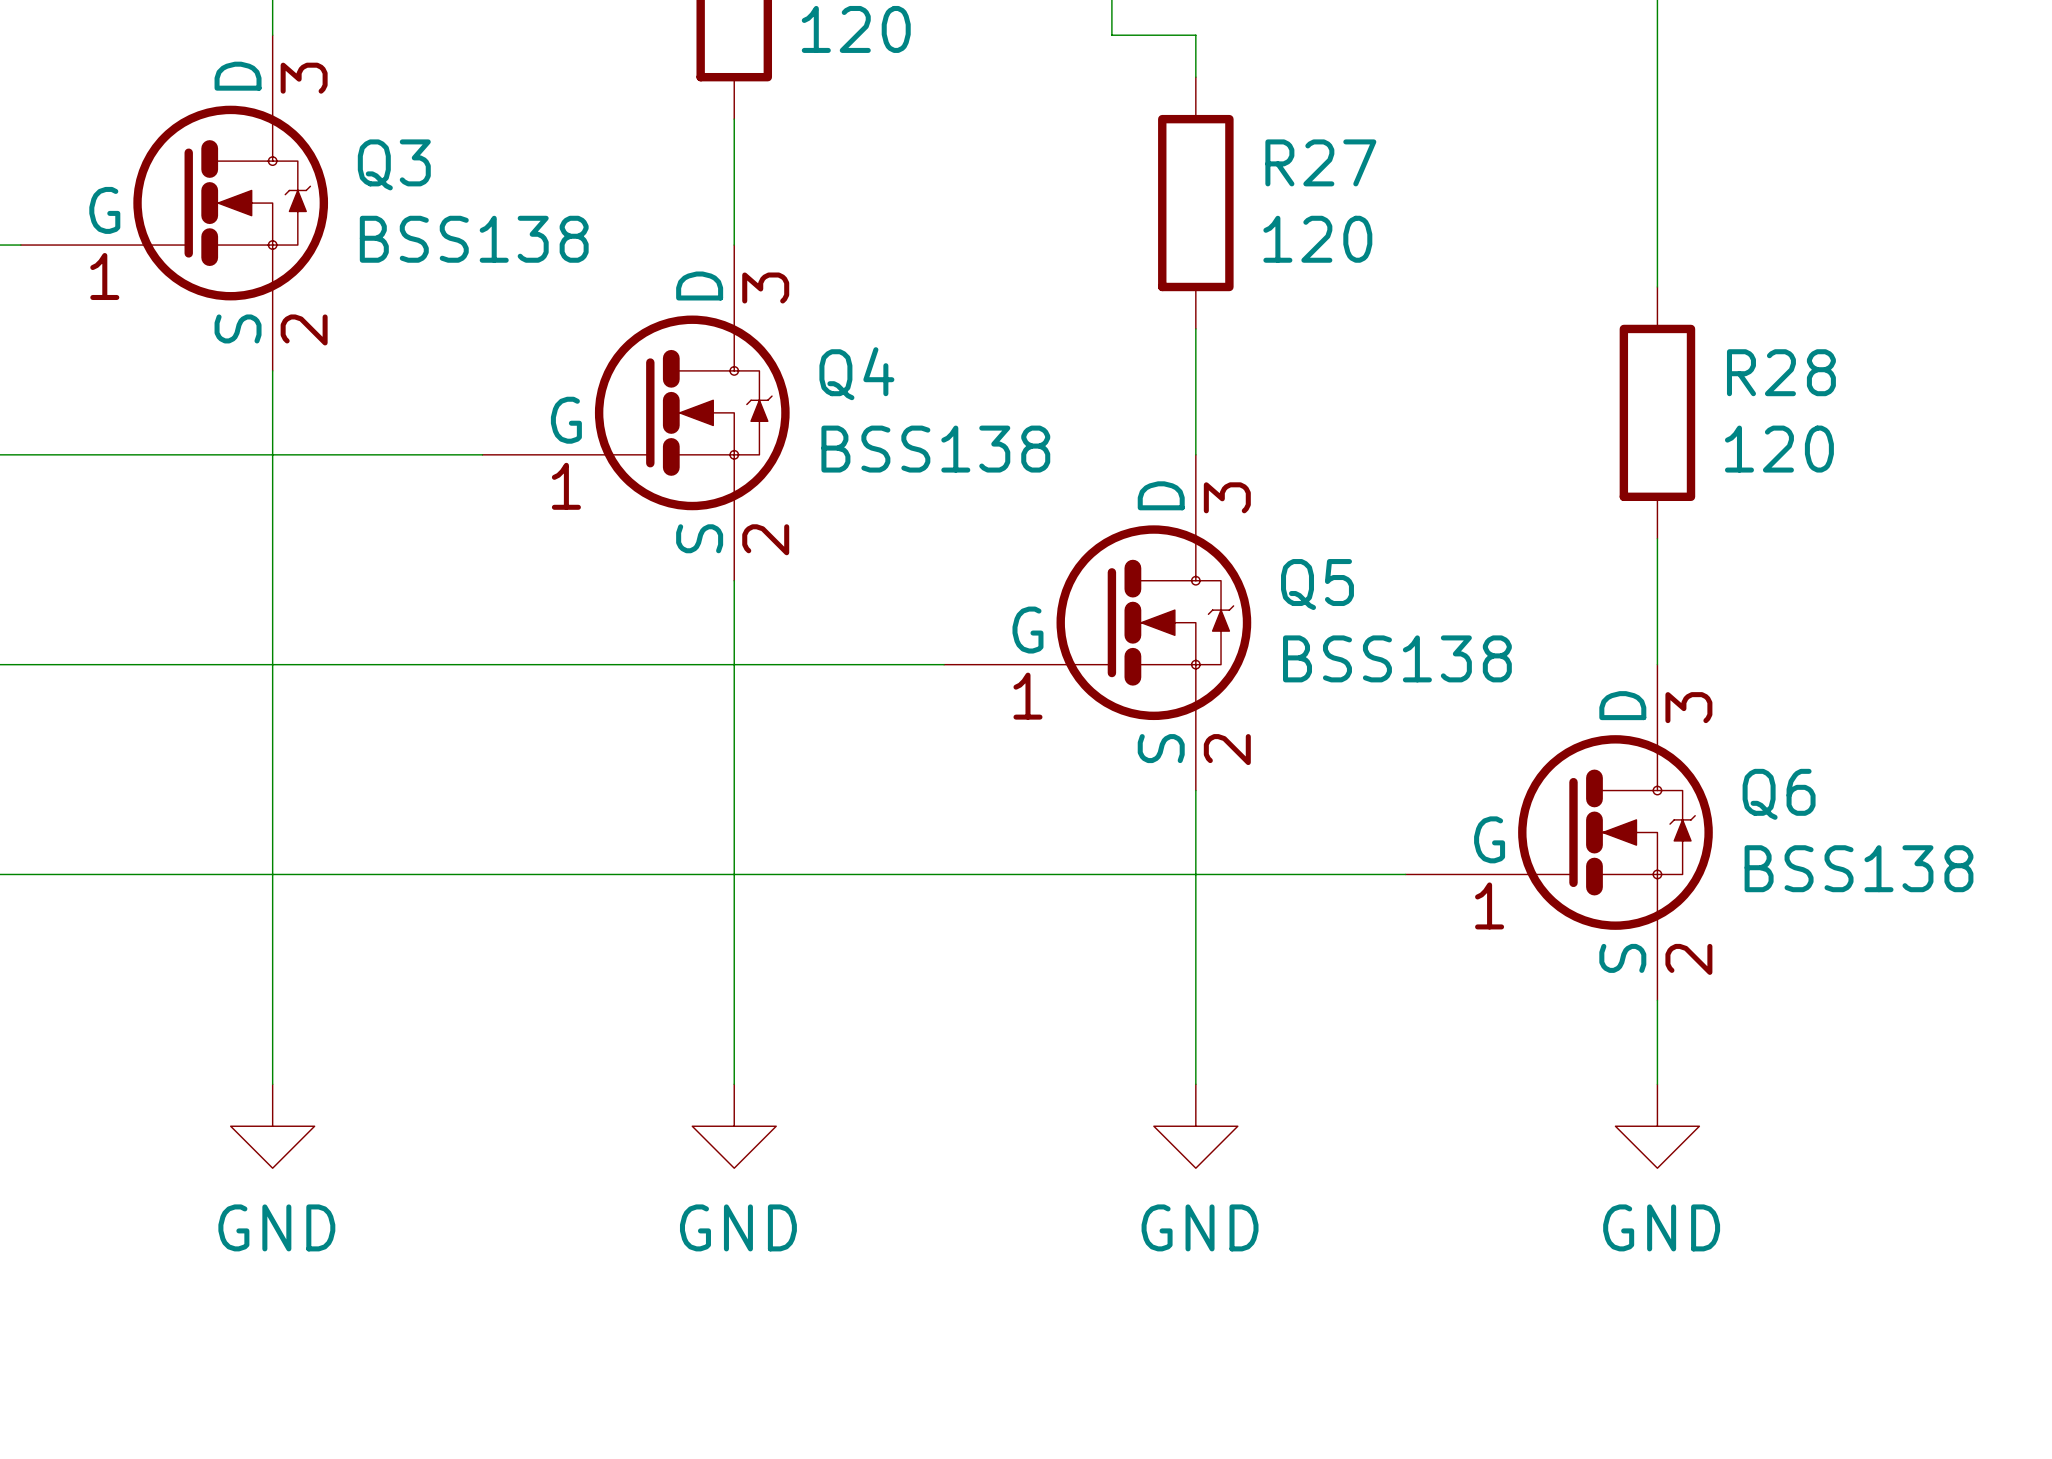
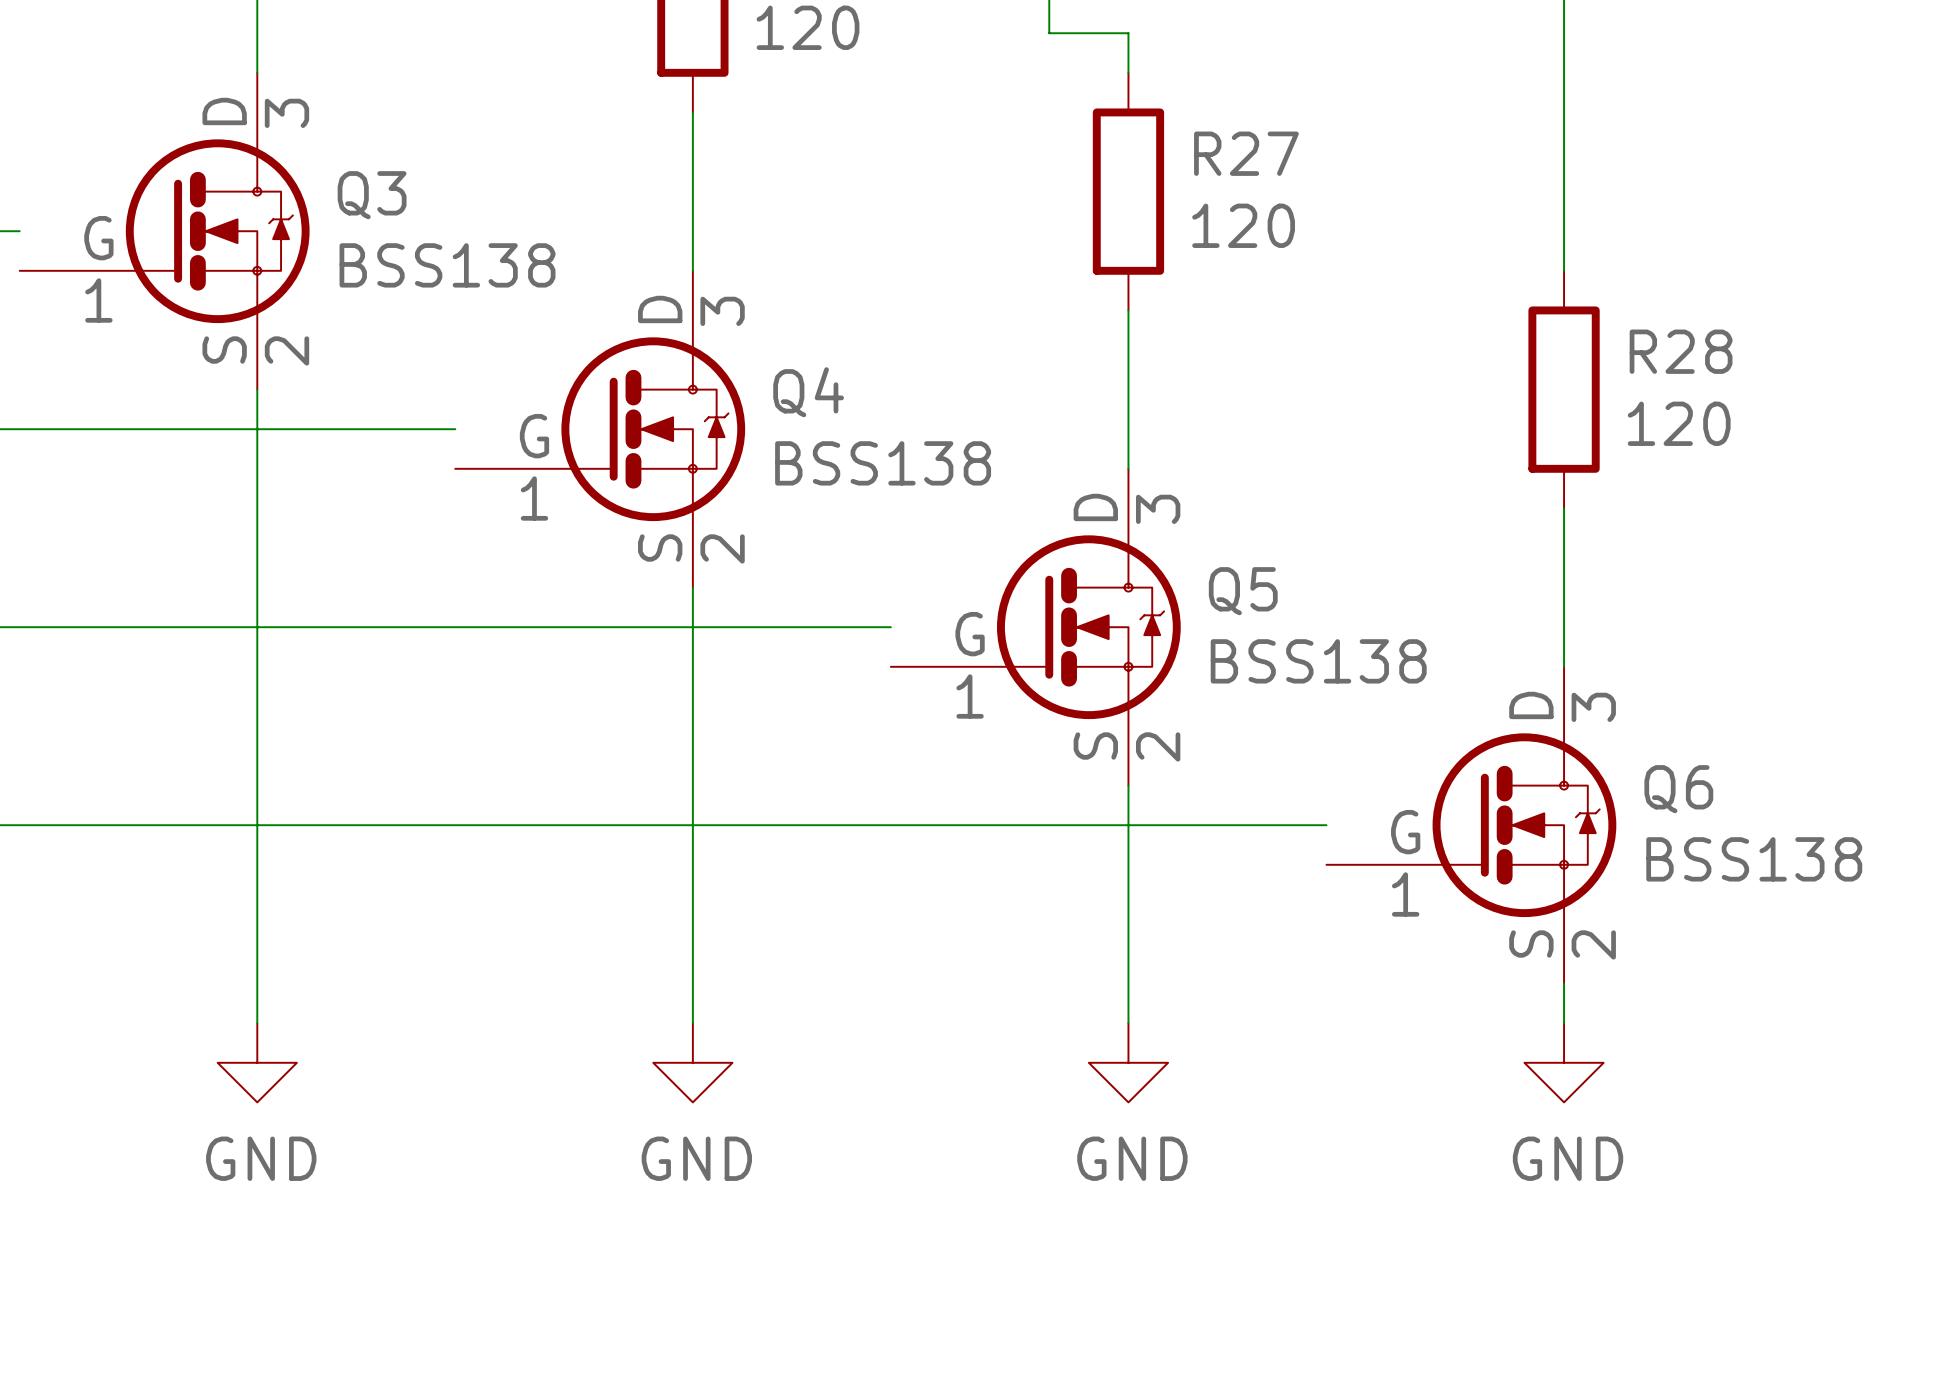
Q3 position: (174, 203) -> (164, 231)
Q4 position: (636, 412) -> (600, 429)
Q5 position: (1097, 622) -> (1035, 627)
Q6 position: (1559, 832) -> (1471, 825)

